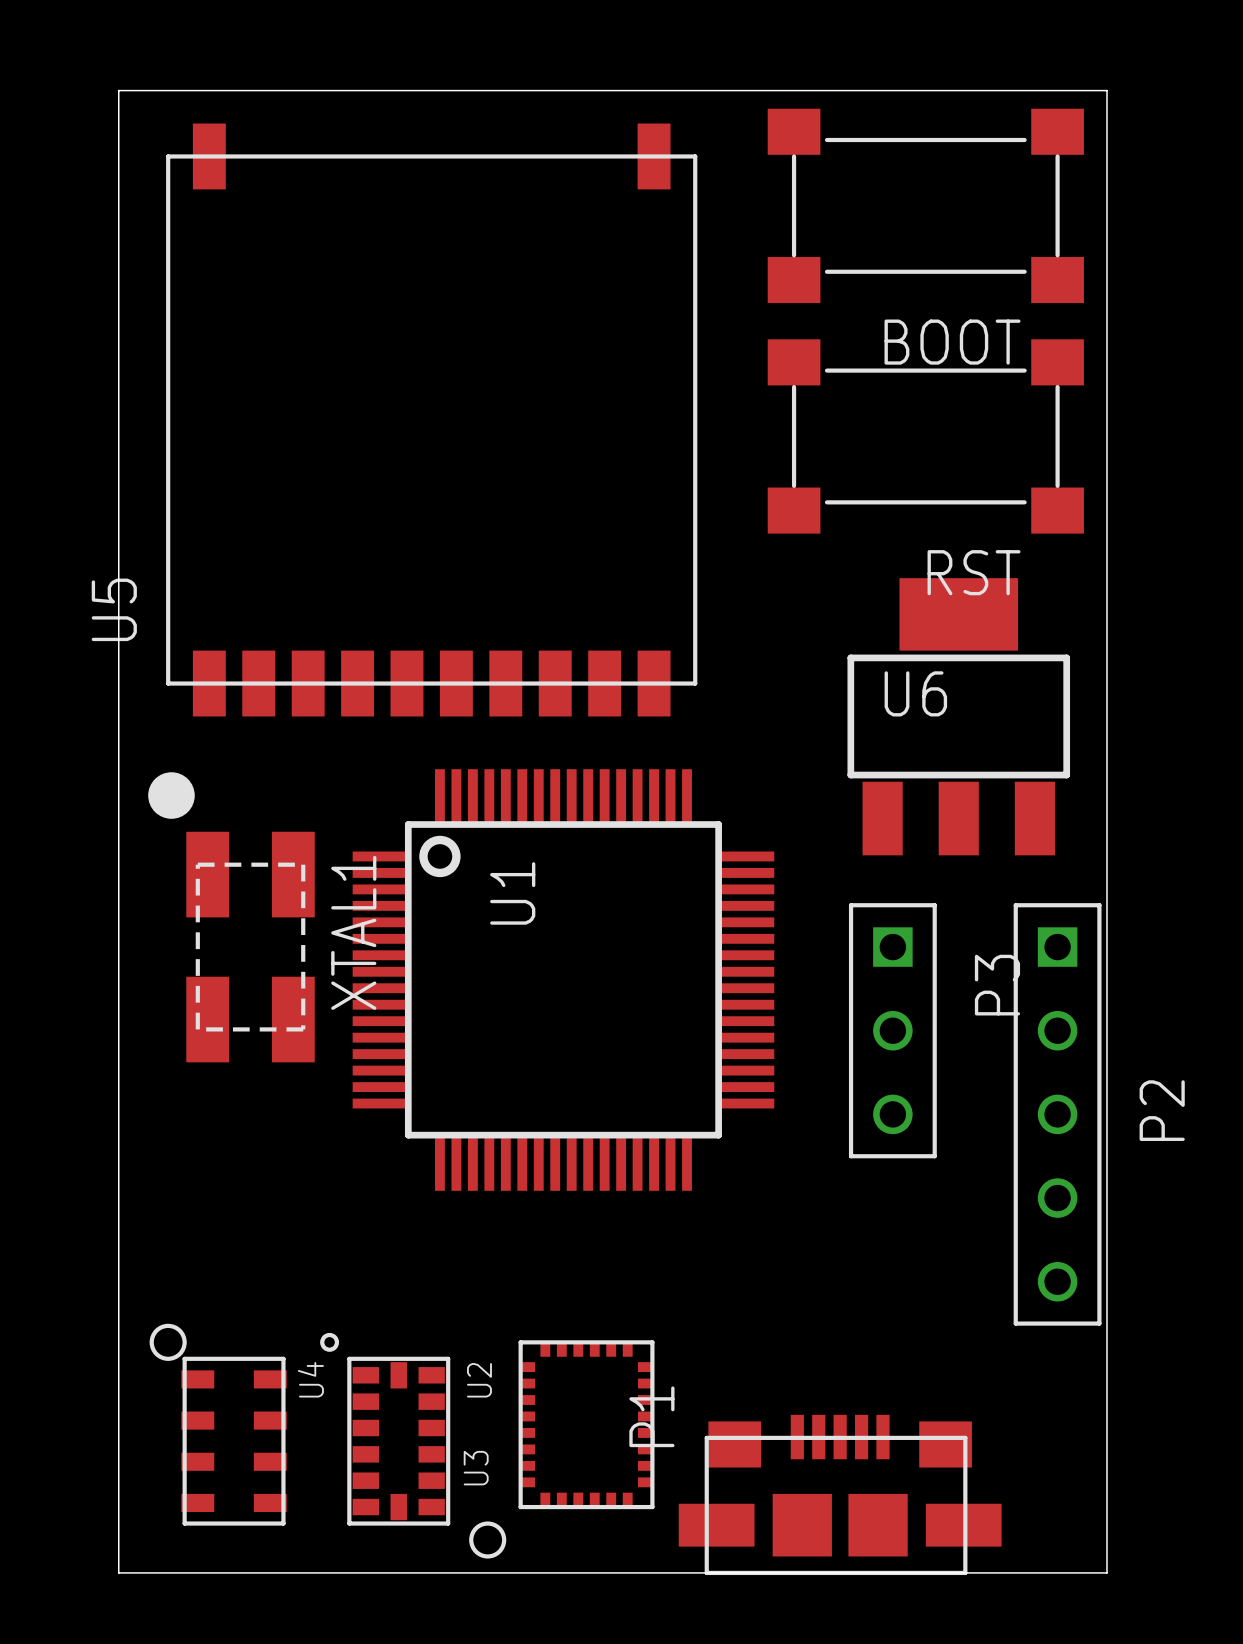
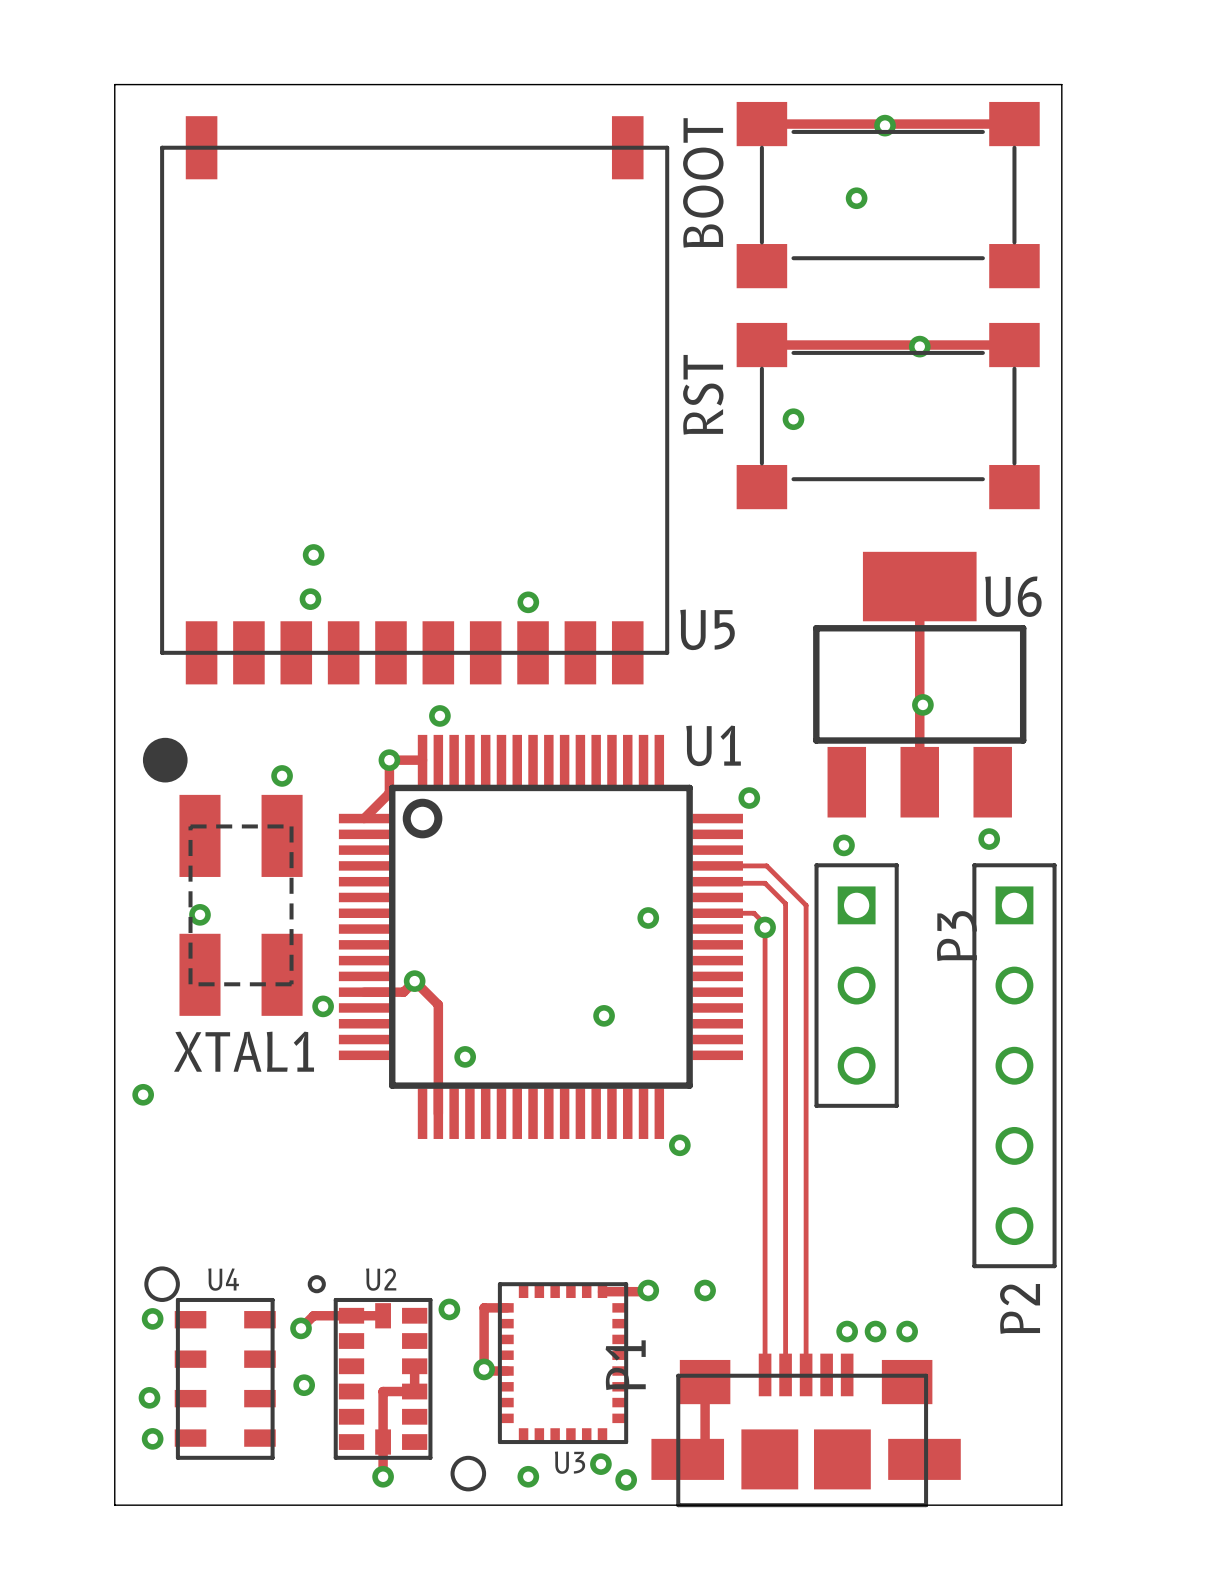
track: none -> (761, 124) (883, 124) (885, 125) (886, 124) (1014, 124)
via: none -> (885, 125)
via: none -> (856, 198)
BOOT name rotation: 0° (952, 342) -> 90° counterclockwise (703, 182)
BOOT name position: BOOT (952, 342) -> BOOT (703, 182)
track: none -> (761, 345) (1014, 345)
via: none -> (919, 346)
via: none -> (793, 419)
RST name rotation: 0° (974, 572) -> 90° counterclockwise (703, 394)
RST name position: RST (974, 572) -> RST (703, 394)
via: none -> (313, 554)
U5 name rotation: 0° (114, 609) -> 90° clockwise (707, 629)
U5 name position: U5 (114, 609) -> U5 (707, 629)
track: none -> (919, 586) (919, 701) (922, 704) (919, 708) (919, 782)
via: none -> (310, 599)
via: none -> (528, 602)
U6 name position: U6 (915, 693) -> U6 (1013, 596)
via: none -> (922, 704)
via: none -> (439, 715)
via: none -> (389, 760)
track: none -> (422, 760) (389, 760) (389, 793) (364, 818)
via: none -> (282, 775)
via: none -> (749, 798)
via: none -> (989, 839)
via: none -> (843, 845)
U1 name rotation: 0° (512, 893) -> 90° clockwise (713, 745)
U1 name position: U1 (512, 893) -> U1 (713, 745)
track: none -> (717, 865) (766, 865) (806, 905) (806, 1374)
track: none -> (720, 883) (765, 883) (785, 903) (785, 1374)
XTAL1 name rotation: 0° (353, 932) -> 90° clockwise (244, 1051)
XTAL1 name position: XTAL1 (353, 932) -> XTAL1 (244, 1051)
track: none -> (717, 913) (754, 913) (765, 924) (765, 1374)
via: none -> (199, 914)
via: none -> (648, 918)
via: none -> (765, 927)
via: none -> (414, 981)
track: none -> (364, 992) (403, 992) (414, 981) (438, 1004) (438, 1113)
via: none -> (323, 1006)
via: none -> (604, 1015)
via: none -> (465, 1056)
P2 name position: P2 (1162, 1110) -> P2 (1020, 1308)
via: none -> (143, 1094)
via: none -> (679, 1145)
track: none -> (648, 1290) (602, 1291)
via: none -> (648, 1290)
via: none -> (705, 1290)
track: none -> (507, 1307) (484, 1307) (484, 1370) (507, 1371)
via: none -> (449, 1309)
track: none -> (383, 1315) (313, 1315) (301, 1328)
via: none -> (152, 1318)
U4 name rotation: 0° (310, 1379) -> 90° clockwise (223, 1279)
U4 name position: U4 (310, 1379) -> U4 (223, 1279)
U2 name rotation: 0° (479, 1380) -> 90° clockwise (381, 1279)
U2 name position: U2 (479, 1380) -> U2 (381, 1279)
via: none -> (301, 1328)
via: none -> (847, 1331)
via: none -> (875, 1331)
via: none -> (907, 1331)
track: none -> (414, 1366) (414, 1391) (383, 1391) (383, 1476)
via: none -> (484, 1369)
track: none -> (705, 1382) (705, 1459)
via: none -> (304, 1385)
via: none -> (149, 1397)
U3 name rotation: 0° (476, 1468) -> 90° clockwise (570, 1462)
U3 name position: U3 (476, 1468) -> U3 (570, 1462)
via: none -> (152, 1438)
via: none -> (600, 1464)
via: none -> (383, 1476)
via: none -> (528, 1476)
via: none -> (626, 1479)

